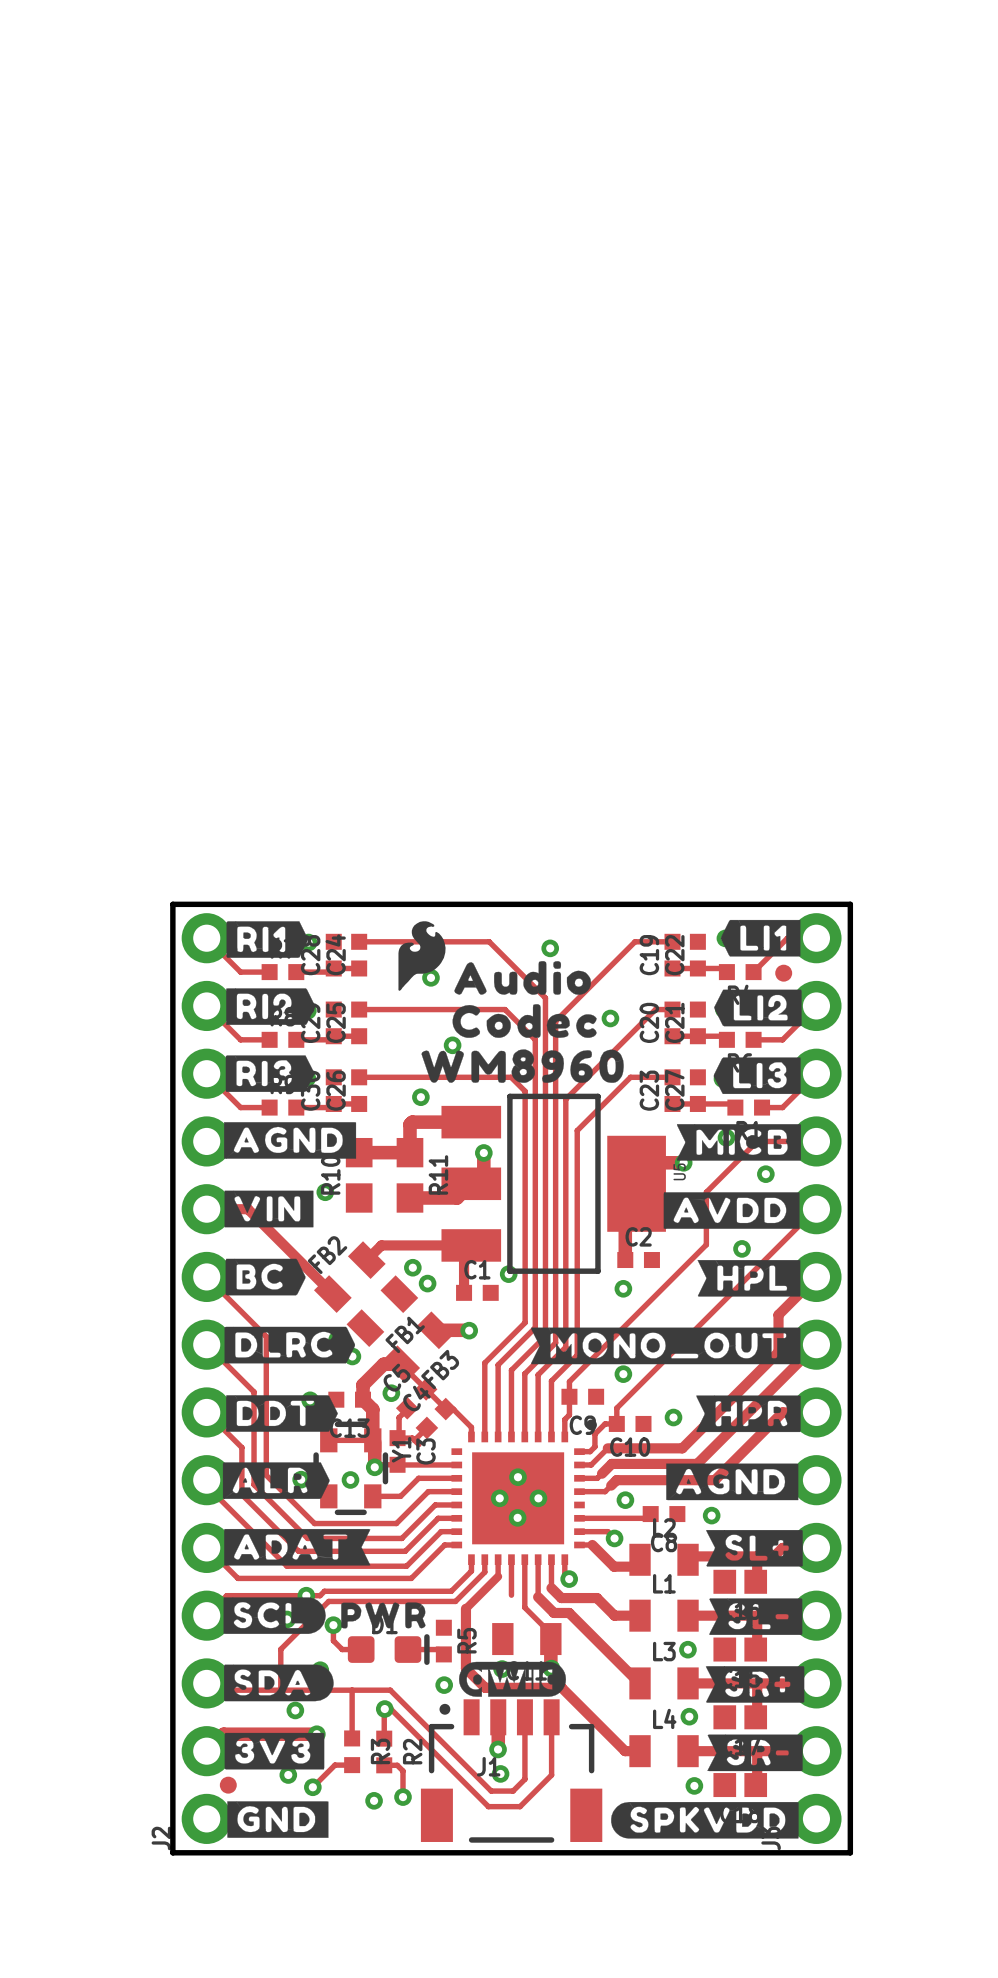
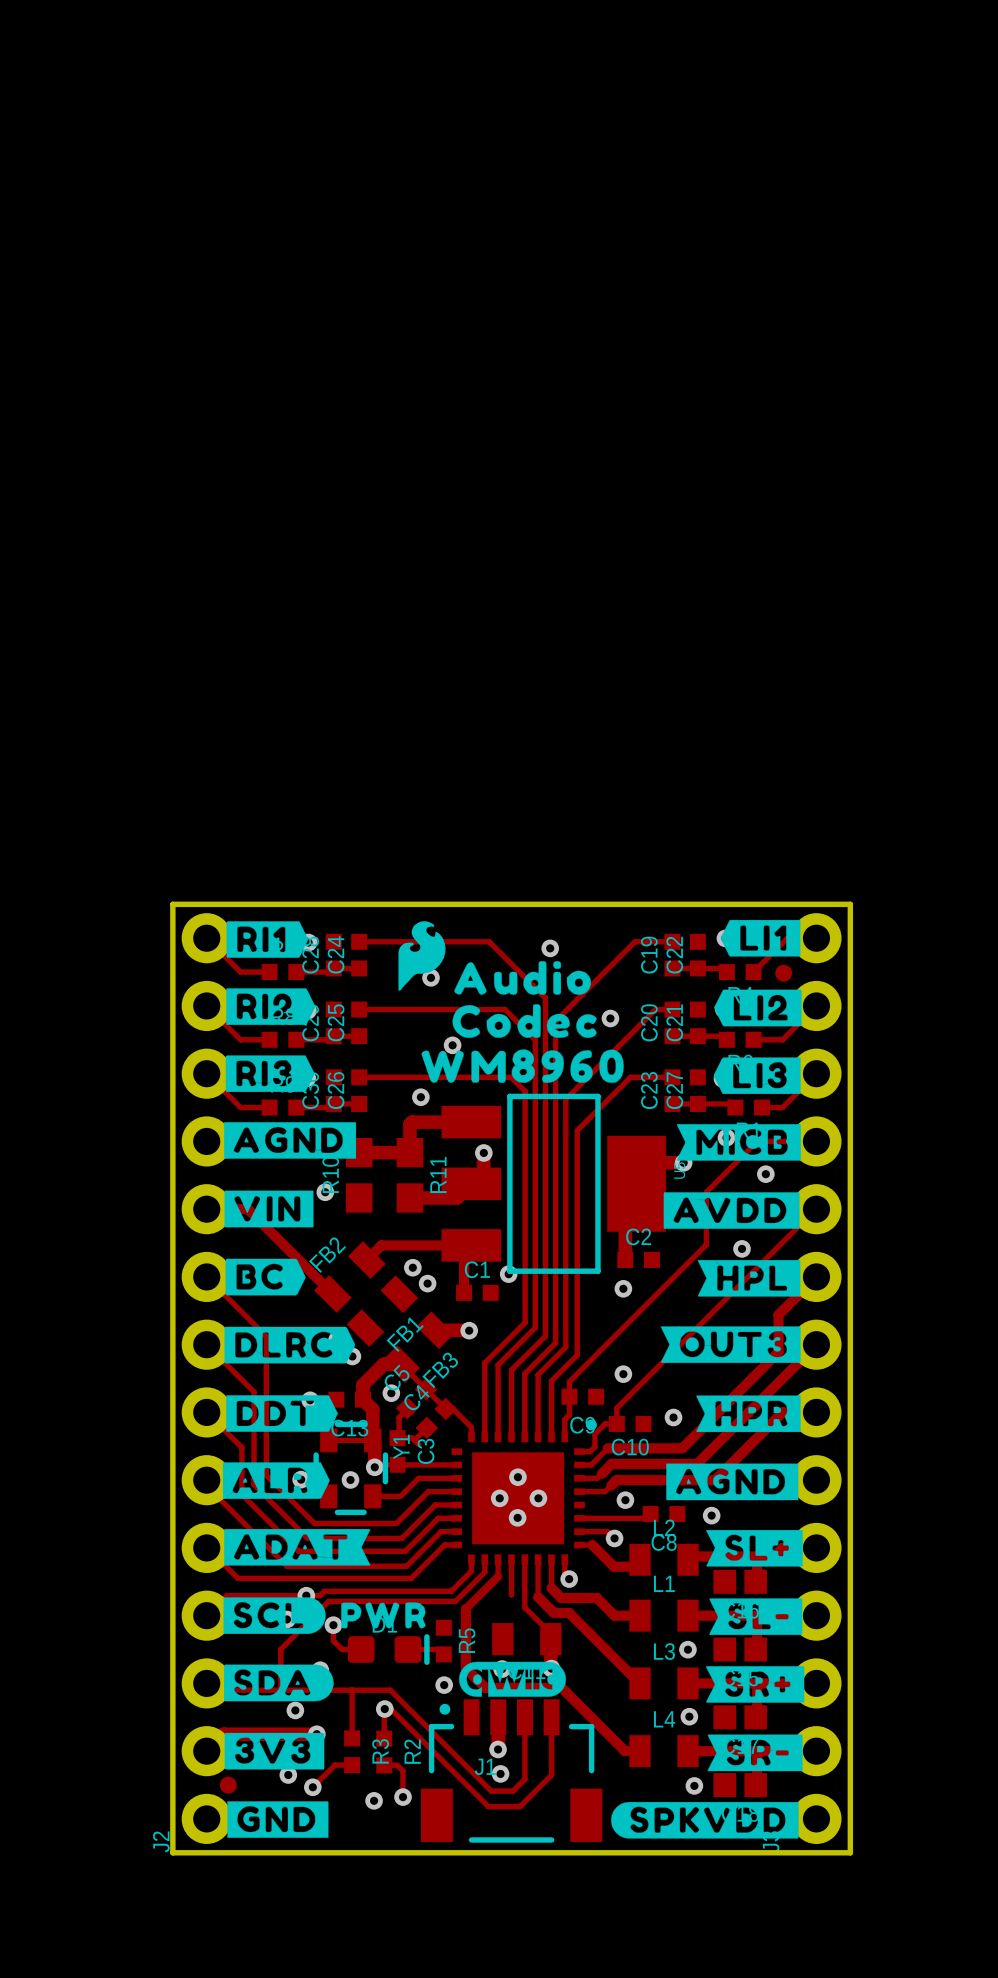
drawing: none -> [660, 1326, 801, 1363]
drawing: [531, 1327, 801, 1365] -> none

